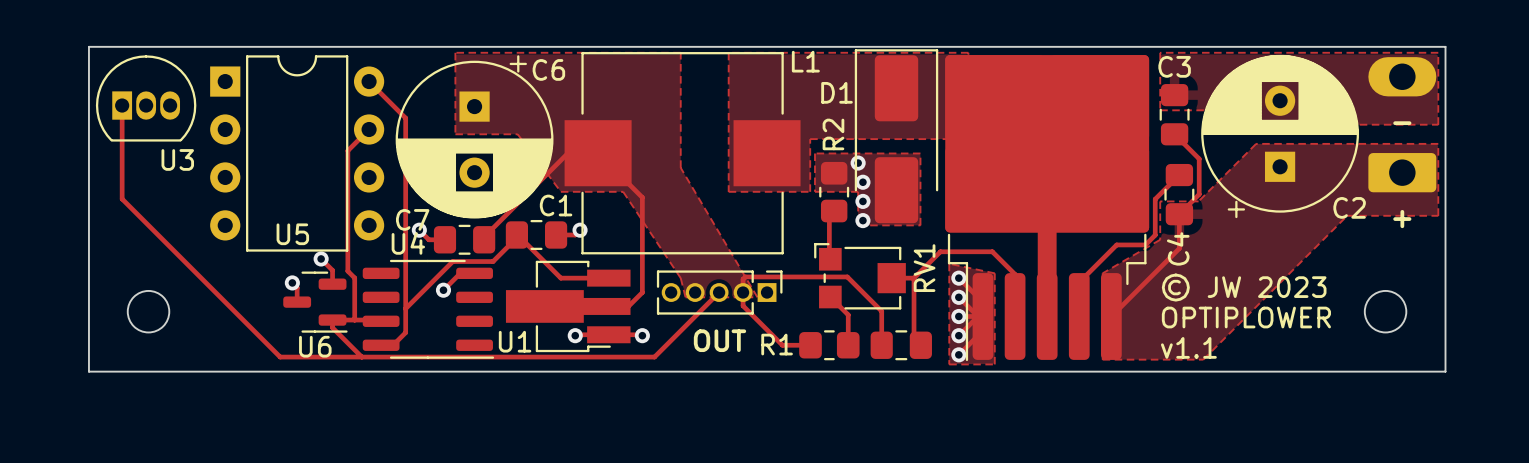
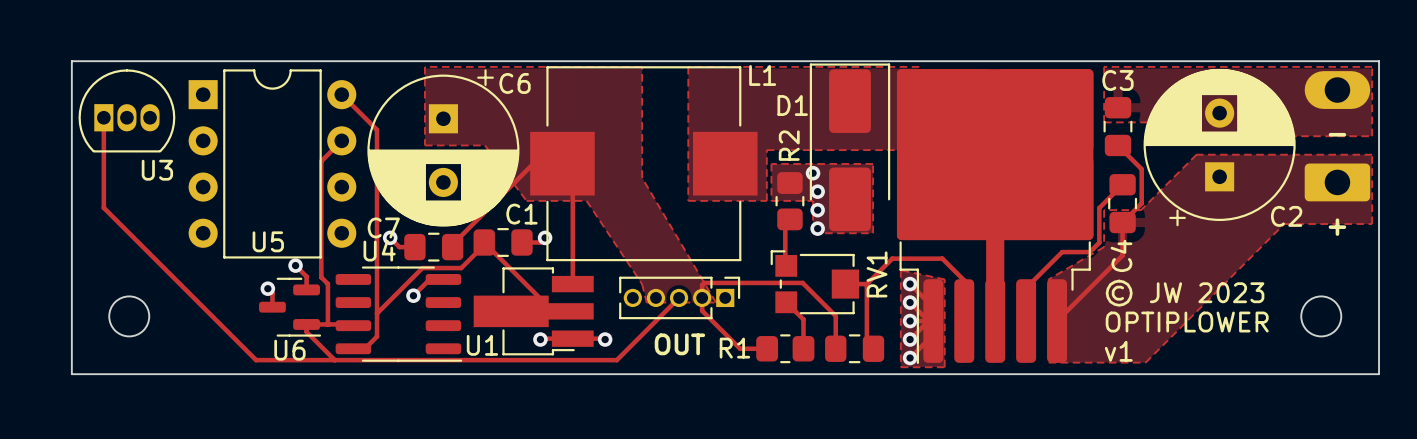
track: (608, 163) (642, 197) (642, 292) (628, 306) (607, 306) -> (572, 174) (572, 284)
track: (516, 234) (560, 278) (608, 278) -> (484, 242) (553, 311)
text: v1.1 (1188, 347) -> v1 (1118, 351)

